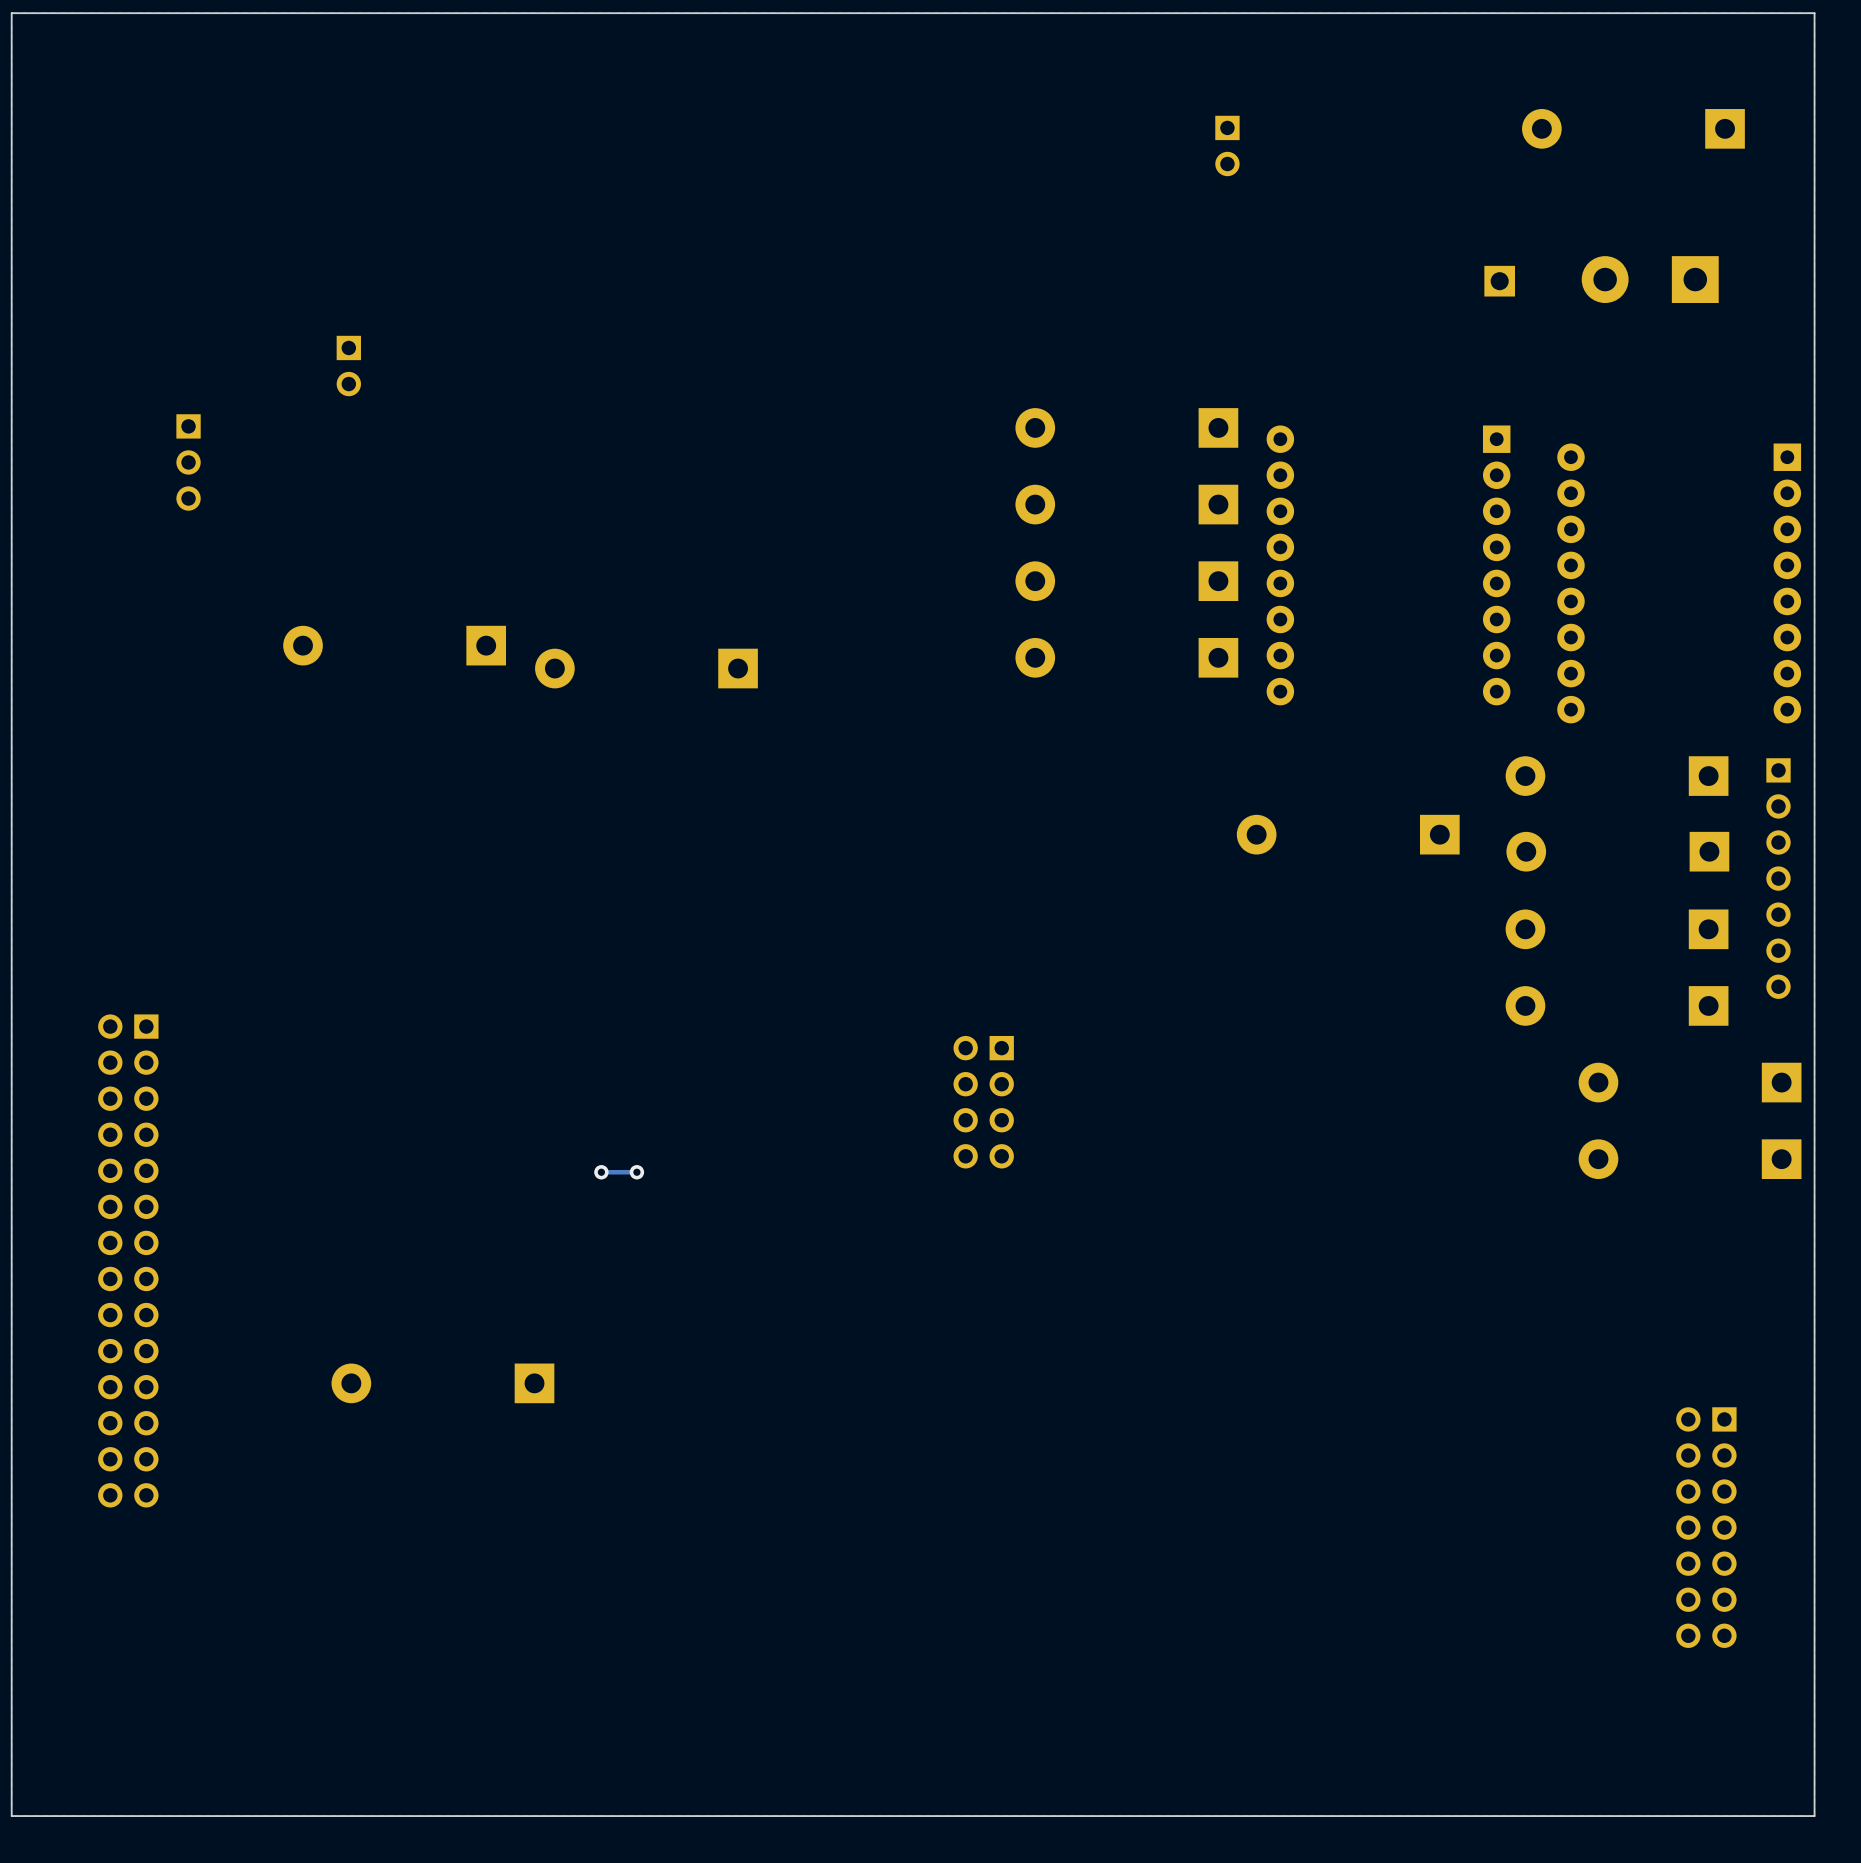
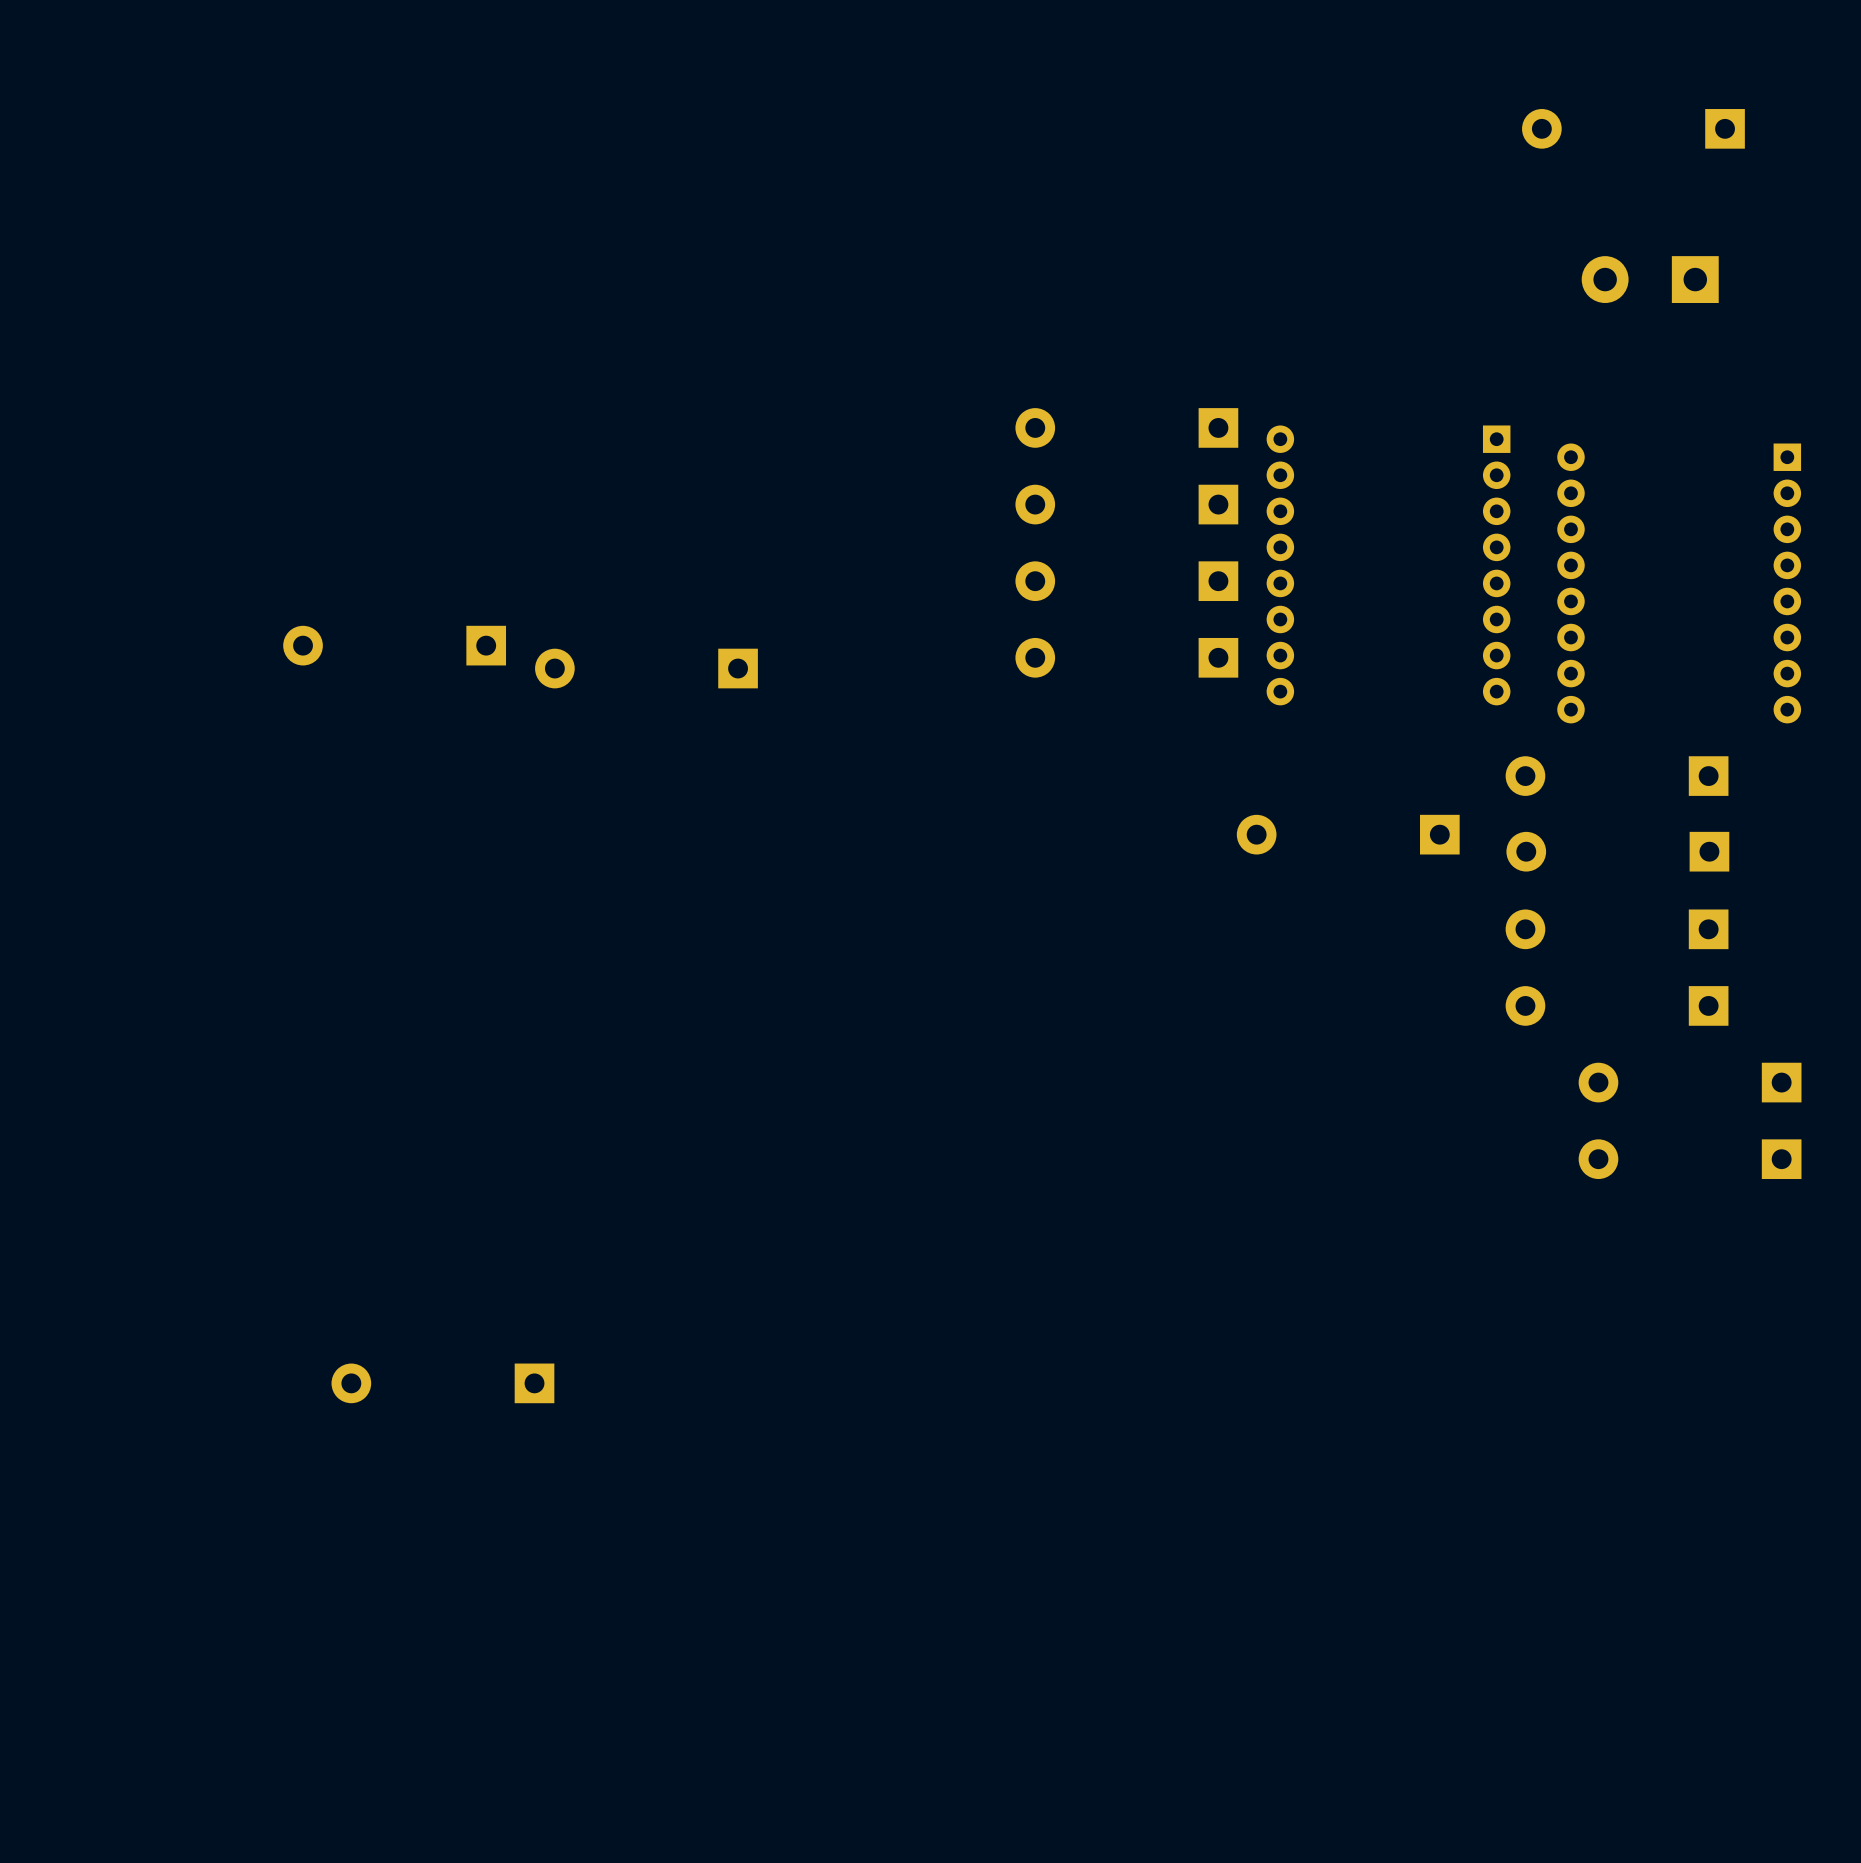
board edge: (1814, 13) (1814, 1816) (11, 1816) (11, 13) (1814, 13) -> none
part: (1227, 145) -> none
part: (1499, 281) -> none
part: (348, 366) -> none
part: (188, 462) -> none
part: (1778, 878) -> none
part: (983, 1102) -> none
via: (601, 1172) -> none
track: (636, 1172) (601, 1172) -> none
via: (636, 1172) -> none
part: (128, 1260) -> none
part: (1706, 1527) -> none

